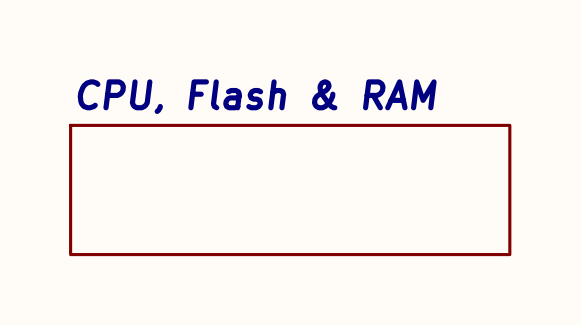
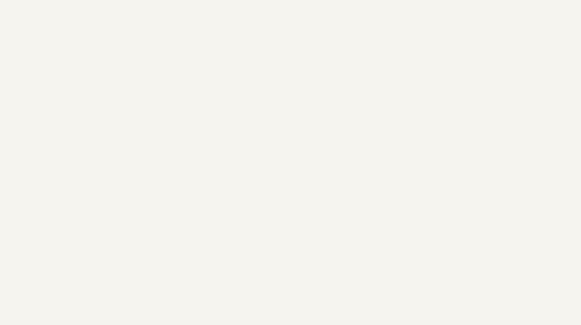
sheet CPU, Flash & RAM: (290, 189) -> none

